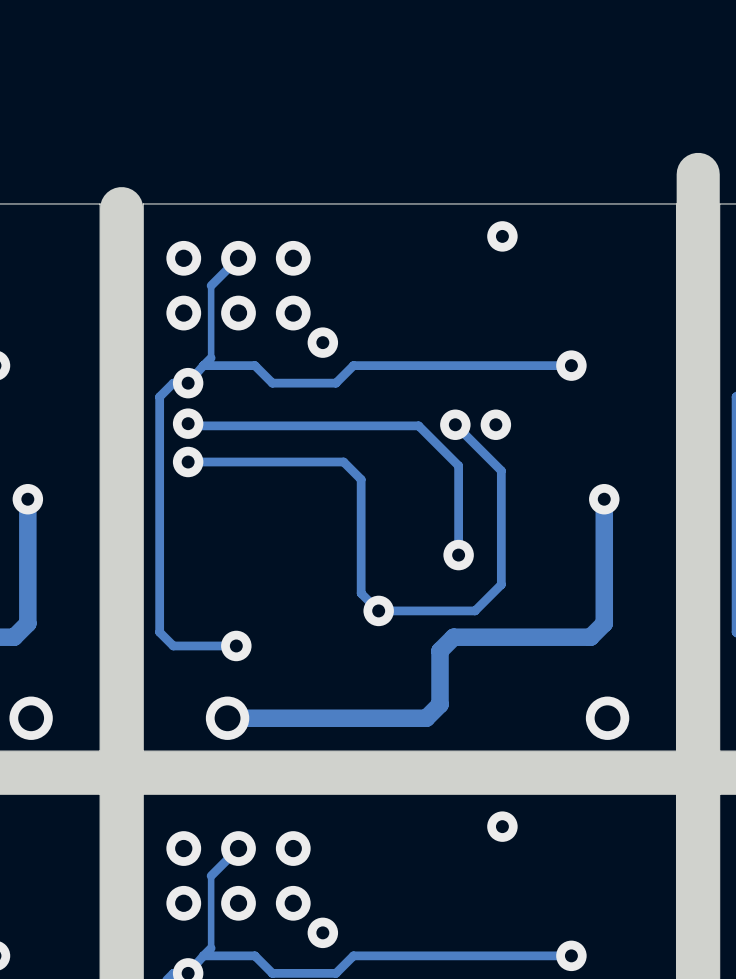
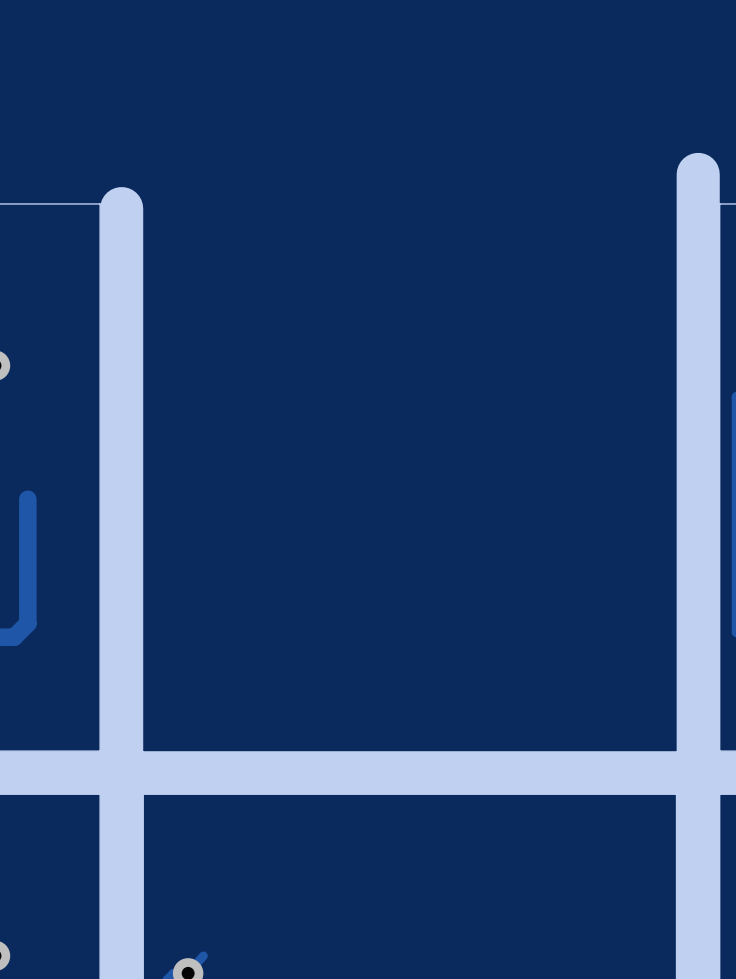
board edge: (676, 203) (676, 751) (143, 751) (143, 203) (676, 203) -> none
via: (502, 236) -> none
via: (183, 258) -> none
track: (238, 258) (211, 285) (211, 357) (203, 365) -> none
via: (238, 258) -> none
via: (293, 258) -> none
via: (183, 313) -> none
via: (238, 313) -> none
via: (293, 313) -> none
via: (322, 342) -> none
track: (203, 365) (188, 383) (173, 383) (159, 396) (159, 632) (173, 645) (236, 645) -> none
track: (571, 365) (353, 365) (335, 383) (272, 383) (254, 365) (203, 365) -> none
via: (571, 365) -> none
via: (188, 383) -> none
track: (188, 423) (188, 425) (418, 425) (458, 465) (458, 555) -> none
via: (188, 423) -> none
track: (455, 424) (501, 470) (501, 584) (475, 610) (378, 610) (361, 593) (361, 479) (343, 461) (188, 461) -> none
via: (455, 424) -> none
via: (495, 424) -> none
via: (188, 461) -> none
via: (27, 499) -> none
track: (604, 499) (604, 623) (590, 637) (453, 637) (440, 650) (440, 704) (426, 718) (227, 718) -> none
via: (604, 499) -> none
via: (458, 555) -> none
via: (378, 610) -> none
via: (236, 645) -> none
via: (31, 718) -> none
via: (227, 718) -> none
via: (607, 718) -> none
via: (502, 826) -> none
via: (183, 848) -> none
track: (238, 848) (211, 875) (211, 948) (203, 955) (254, 955) (272, 973) (335, 973) (353, 955) (571, 955) -> none
via: (238, 848) -> none
via: (293, 848) -> none
via: (183, 903) -> none
via: (238, 903) -> none
via: (293, 903) -> none
via: (322, 932) -> none
via: (571, 955) -> none

